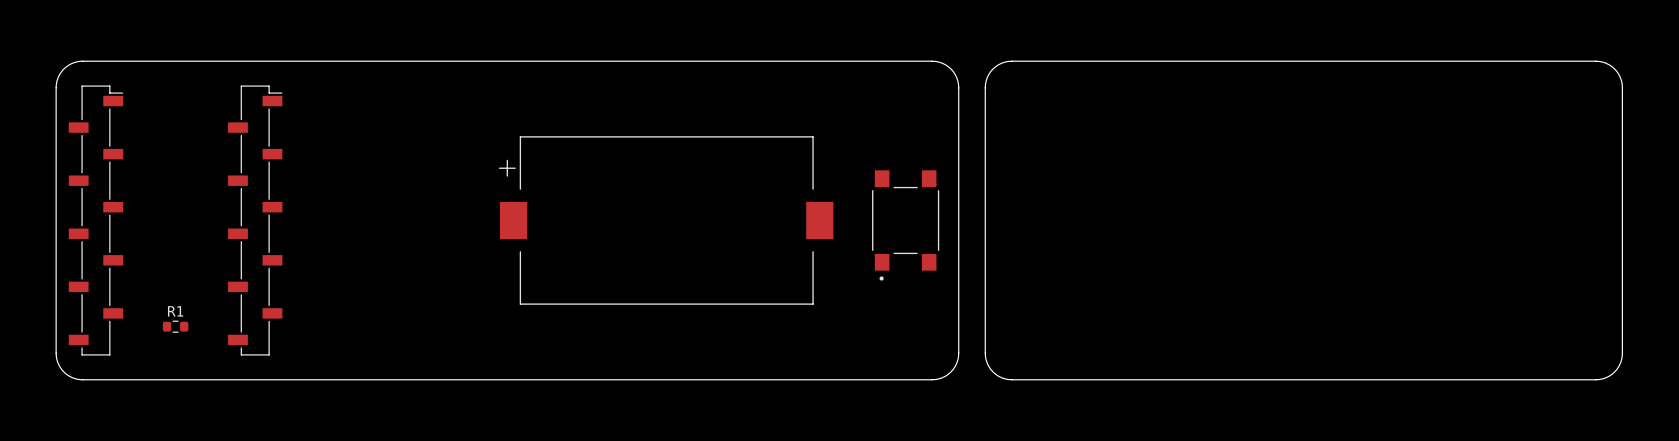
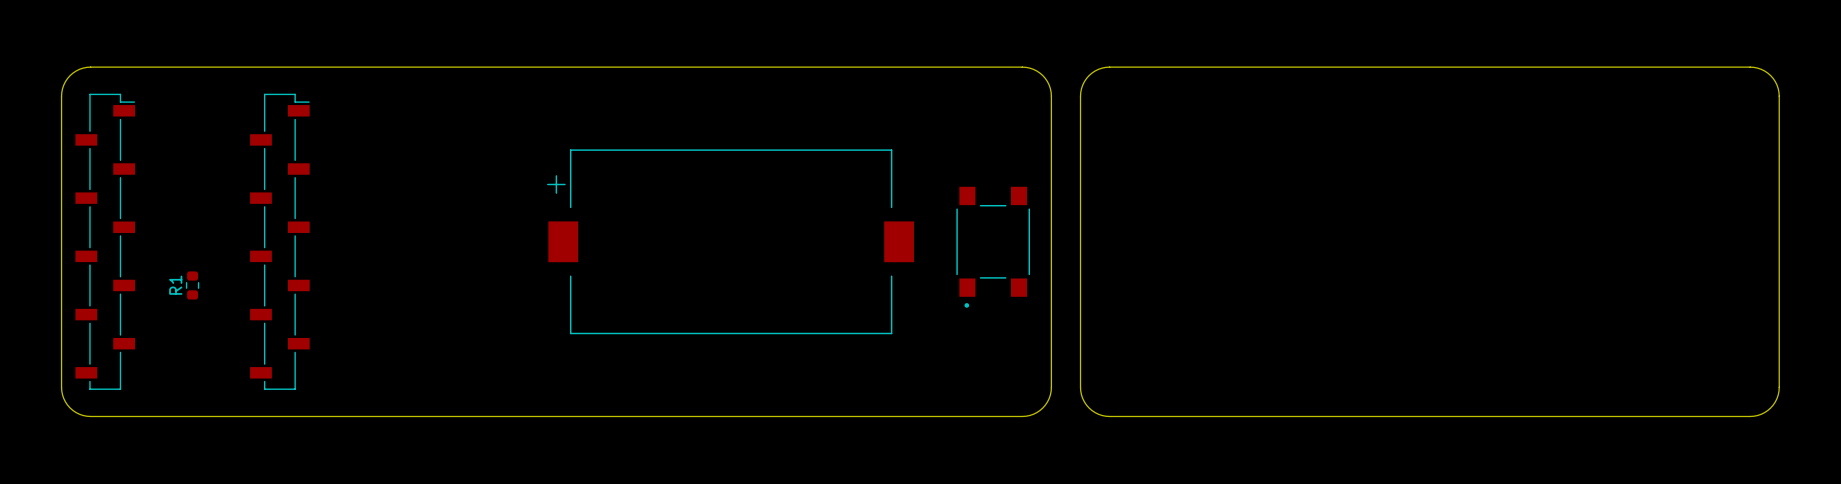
R1 name position: R1 (175, 311) -> R1 (175, 285)
R1 rotation: 0° (175, 326) -> 90° clockwise (192, 285)
R1 position: (175, 326) -> (192, 285)

